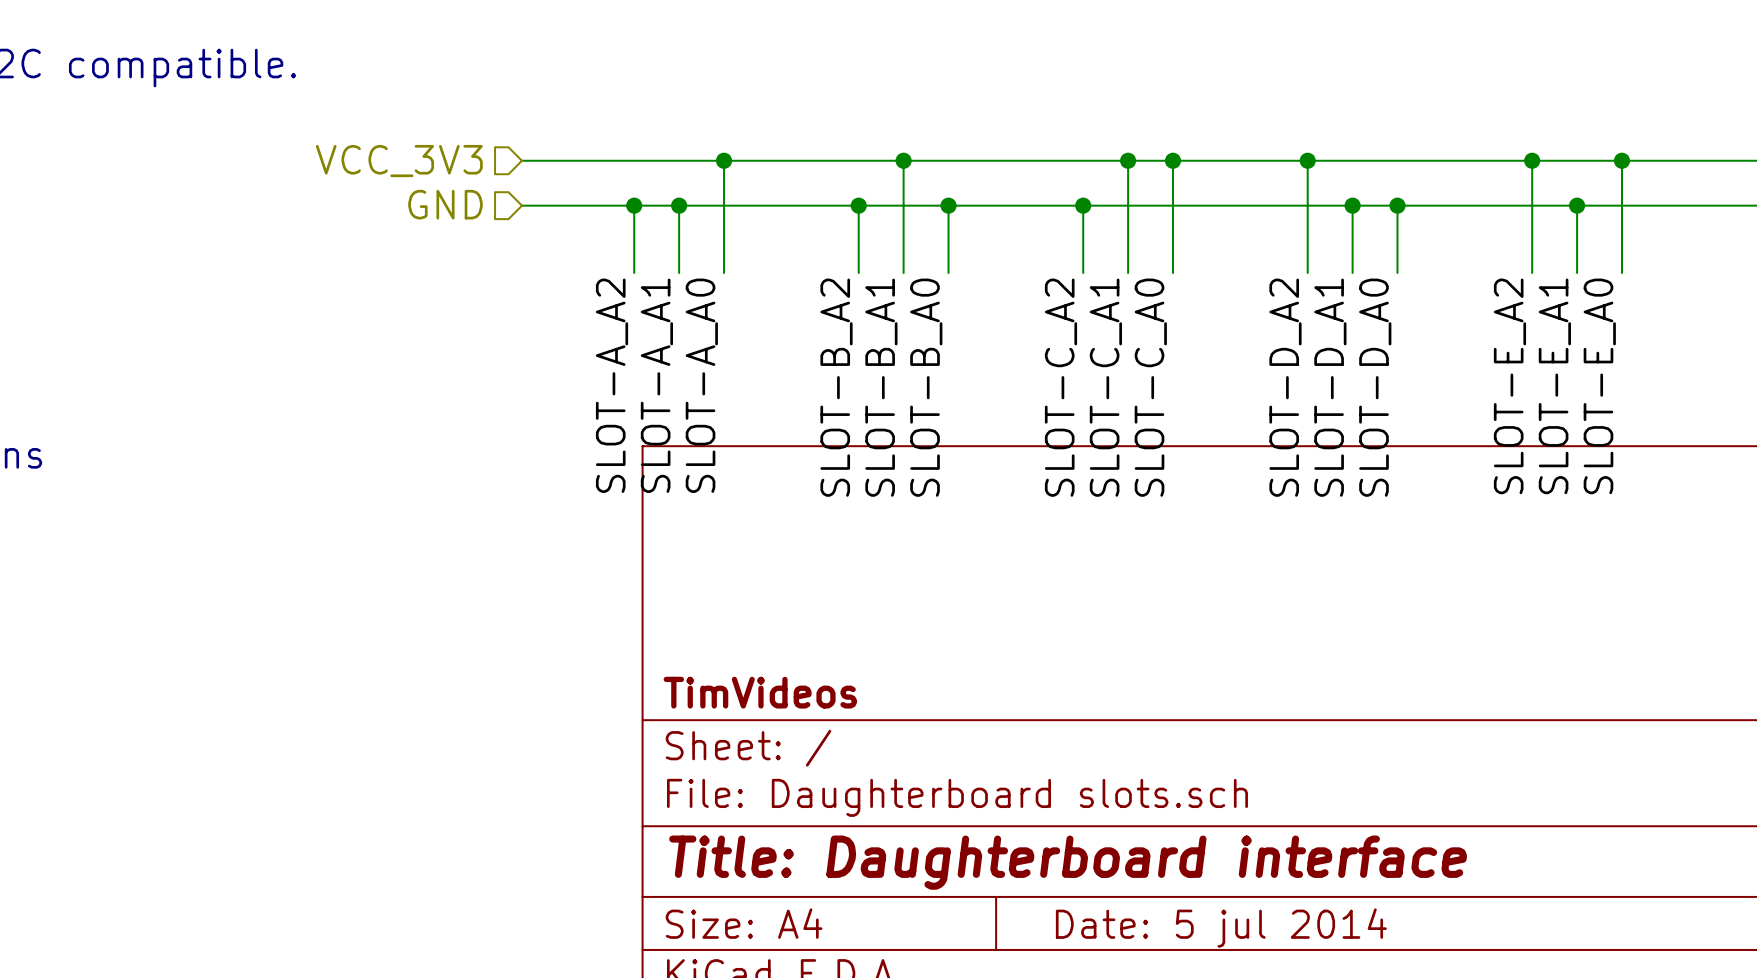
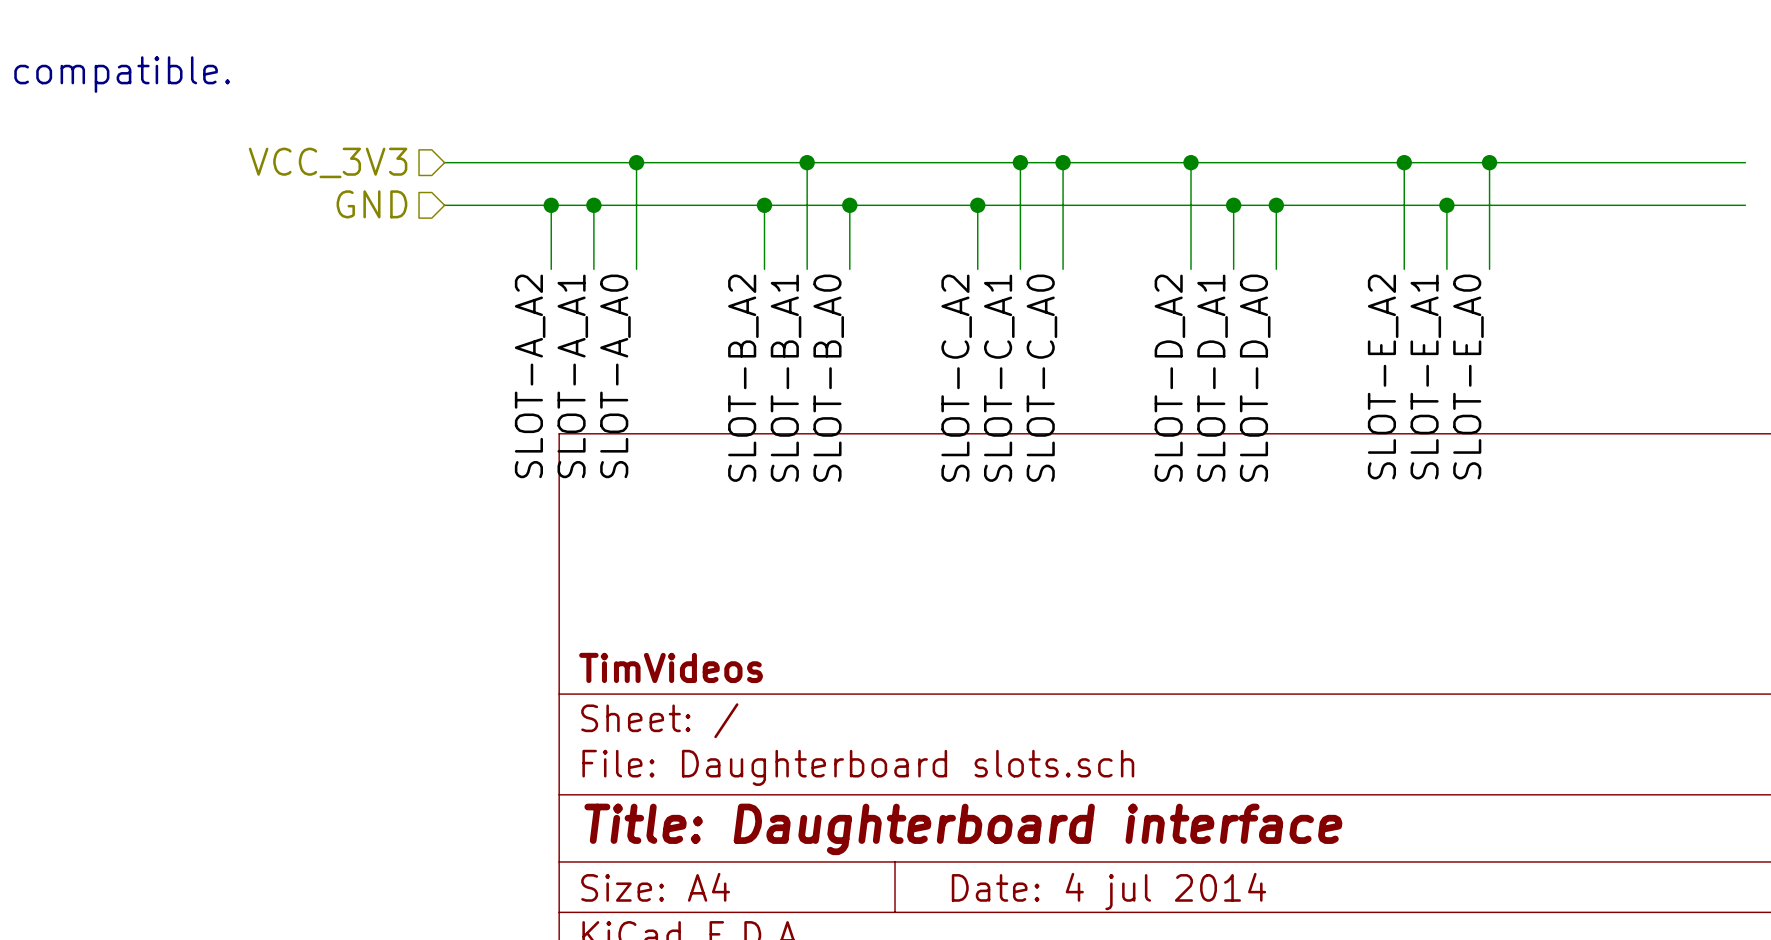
title block: Date: 5 jul 2014 (1221, 928) -> Date: 4 jul 2014 (1108, 891)

